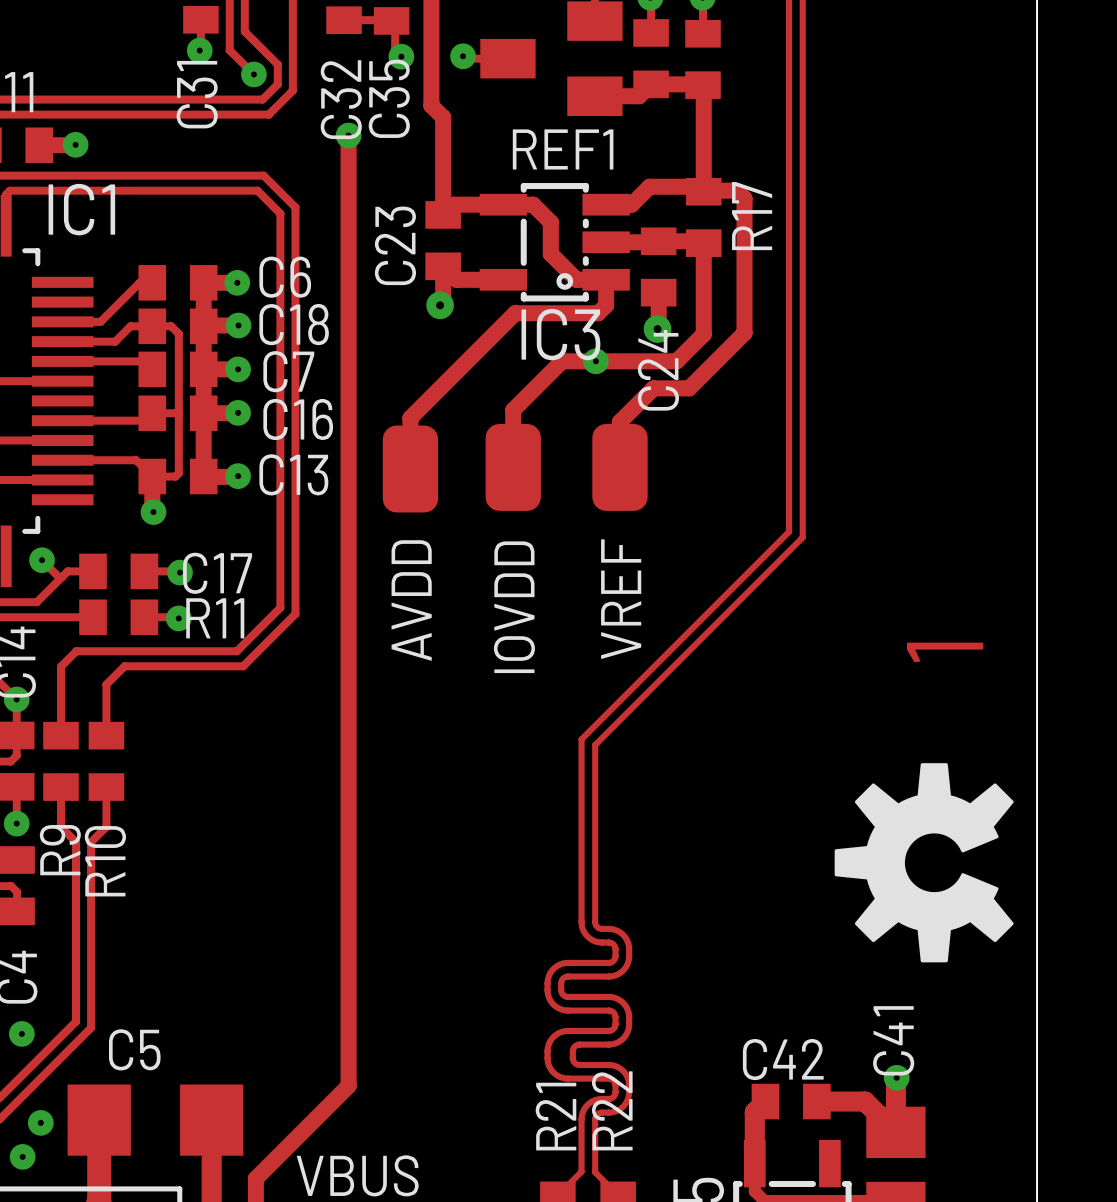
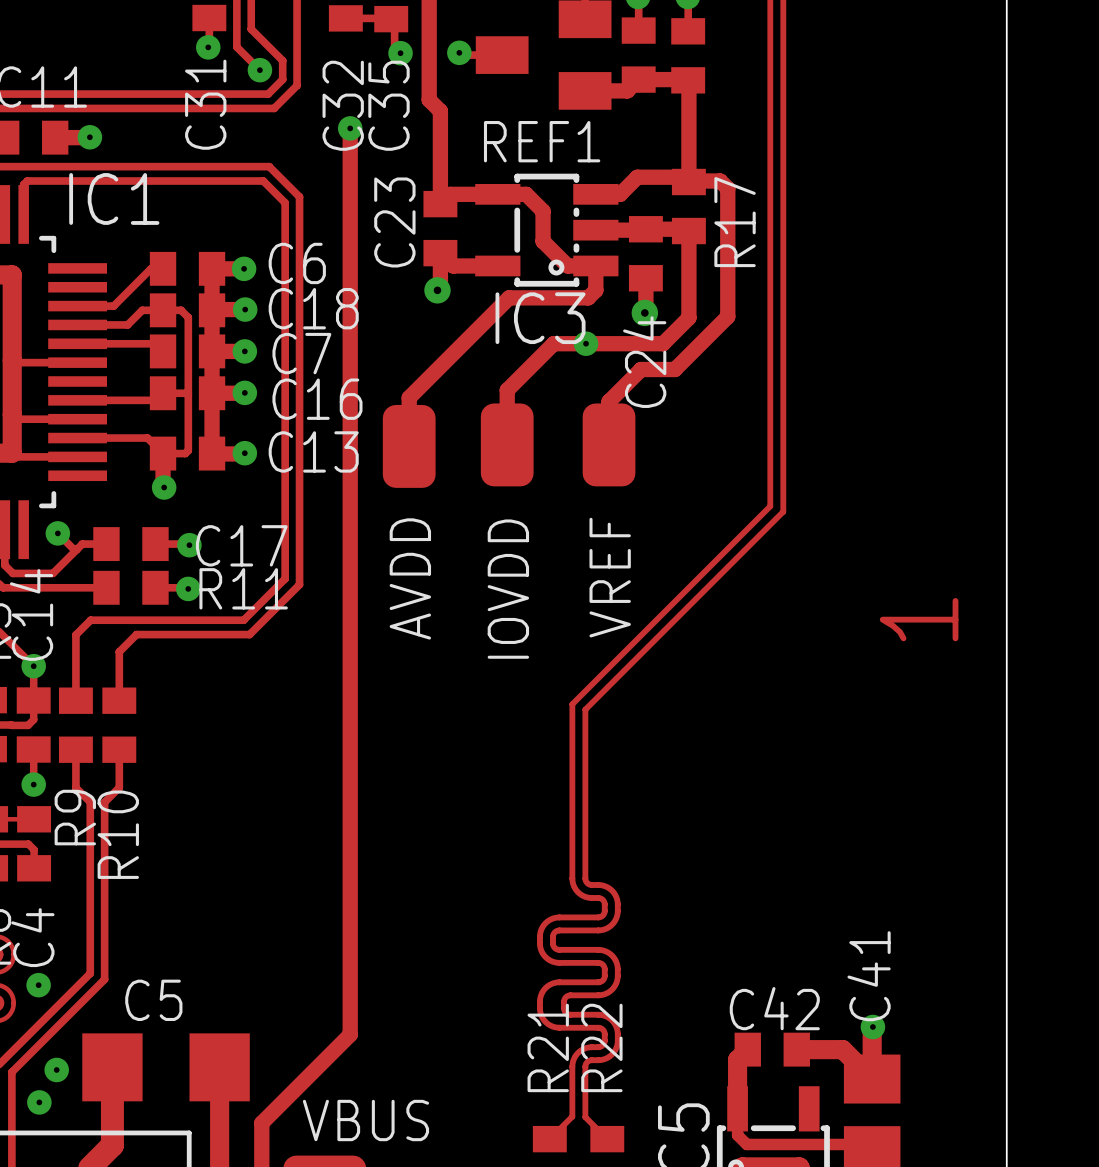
drawing: [834, 763, 1014, 963] -> none

